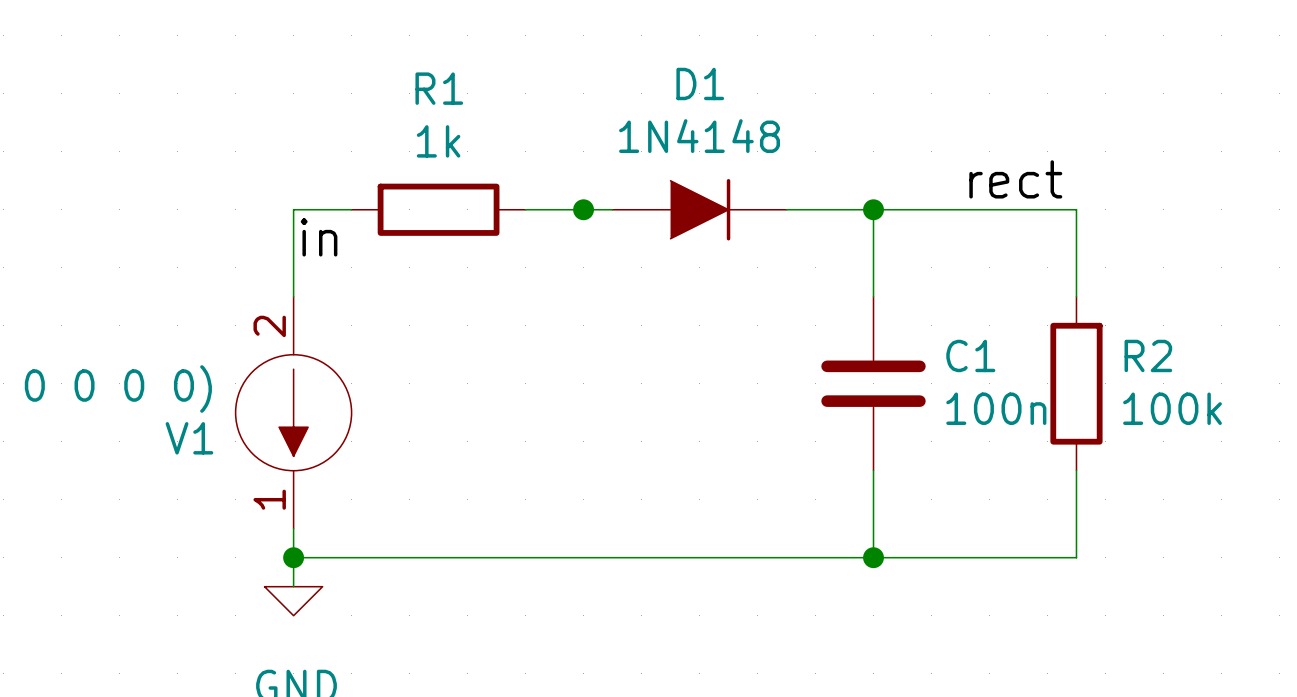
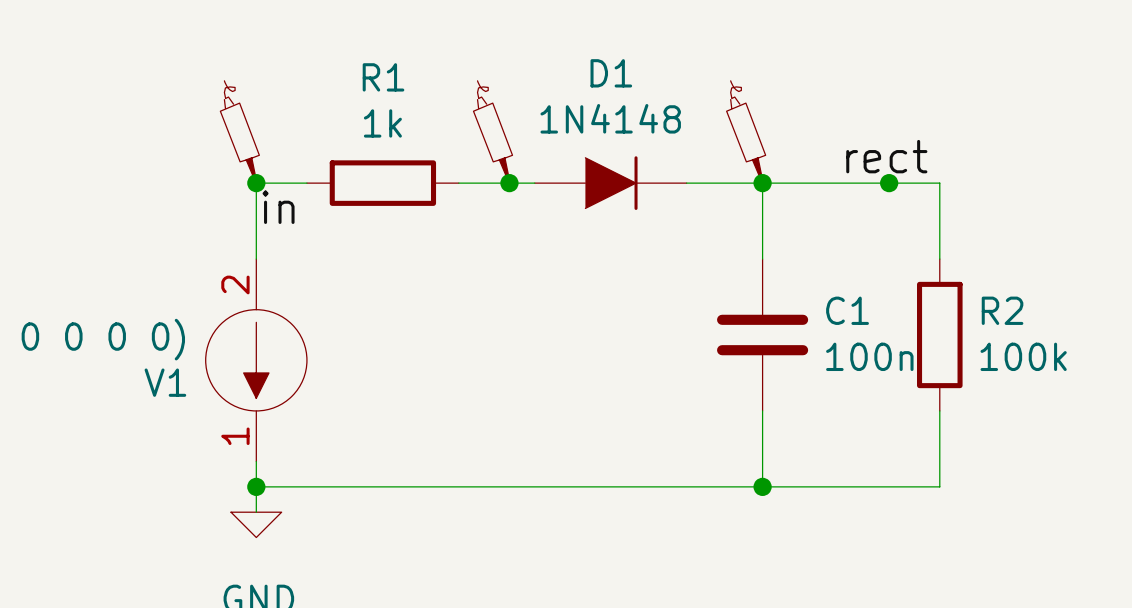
part: none -> (239, 131)
part: none -> (493, 131)
part: none -> (746, 131)
junction: none -> (256, 183)
junction: none -> (889, 183)

